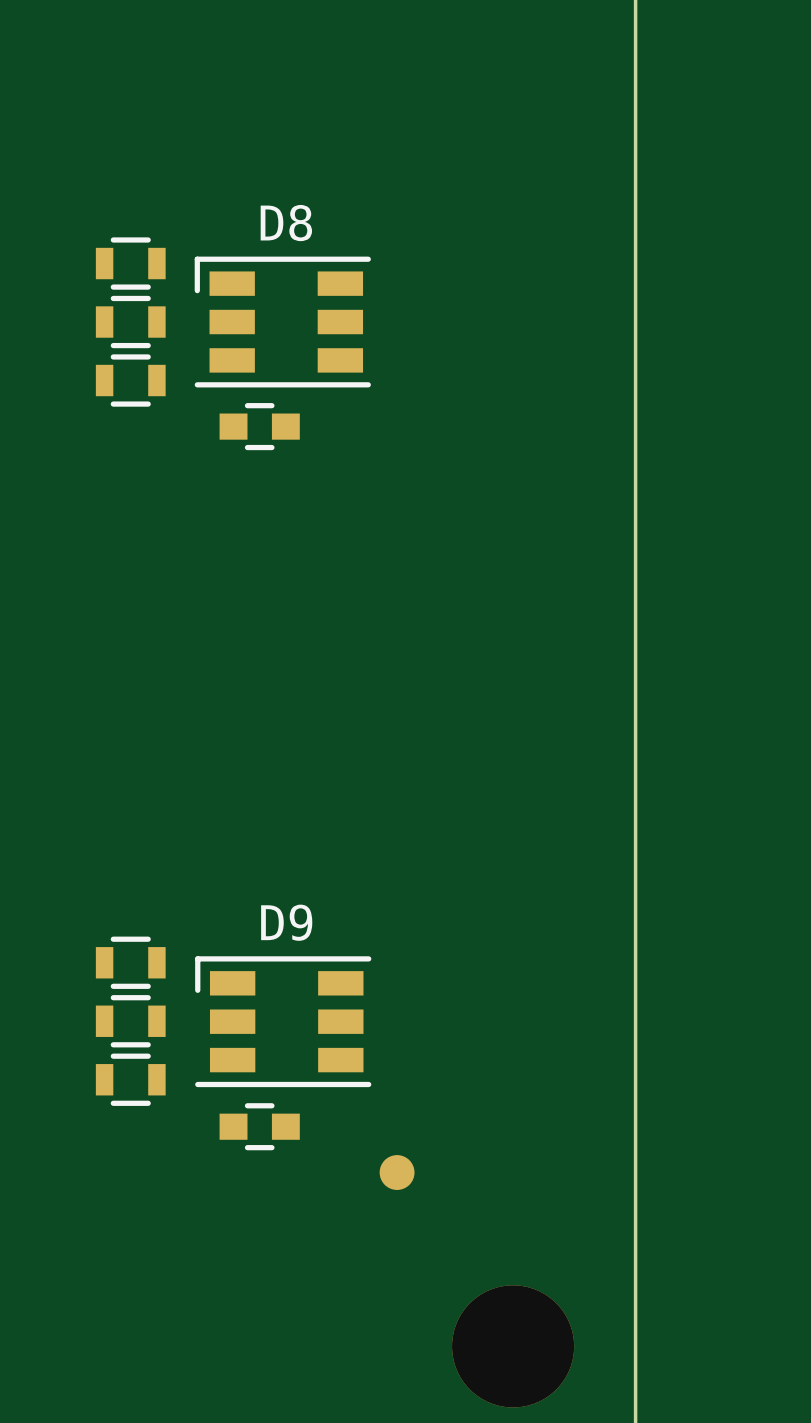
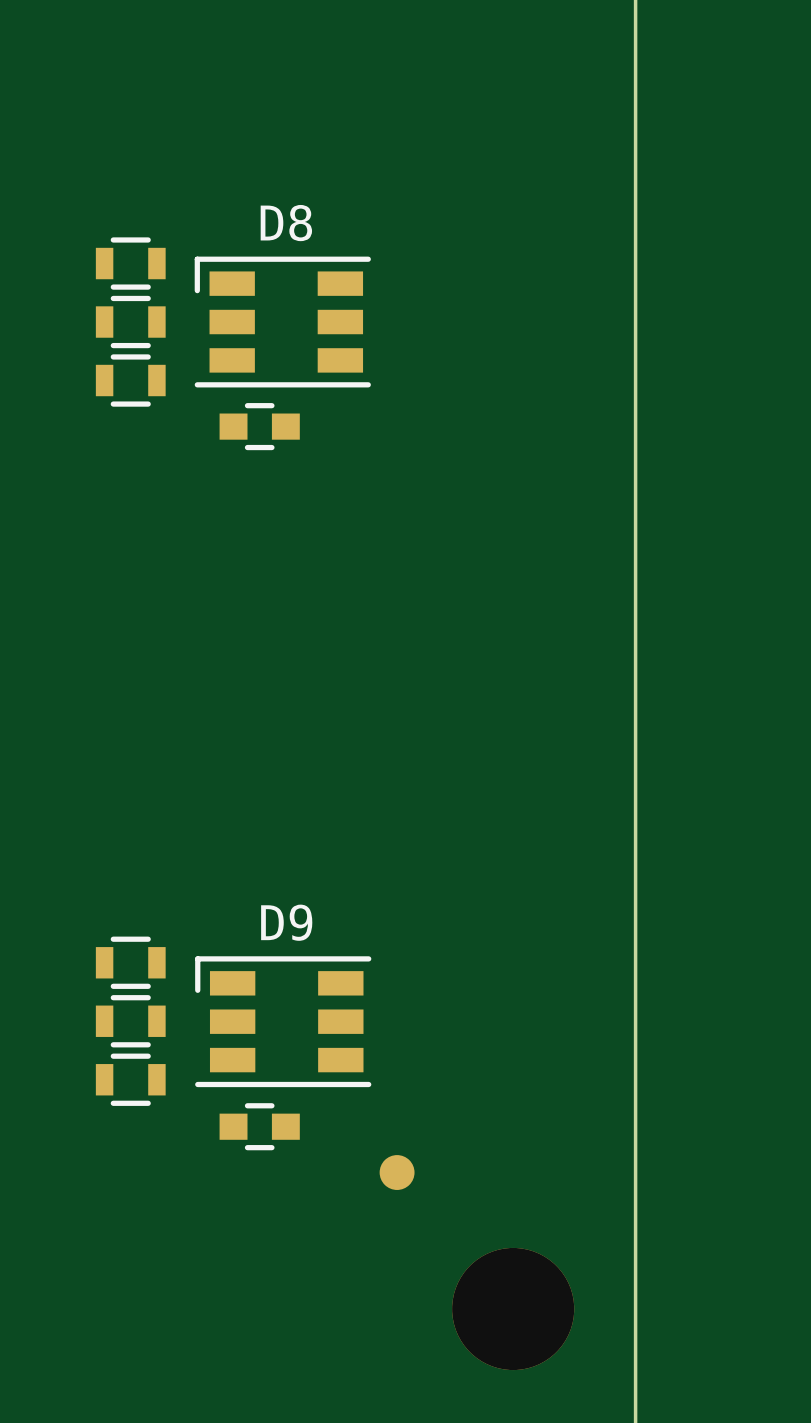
part position: (513, 1346) -> (513, 1309)

